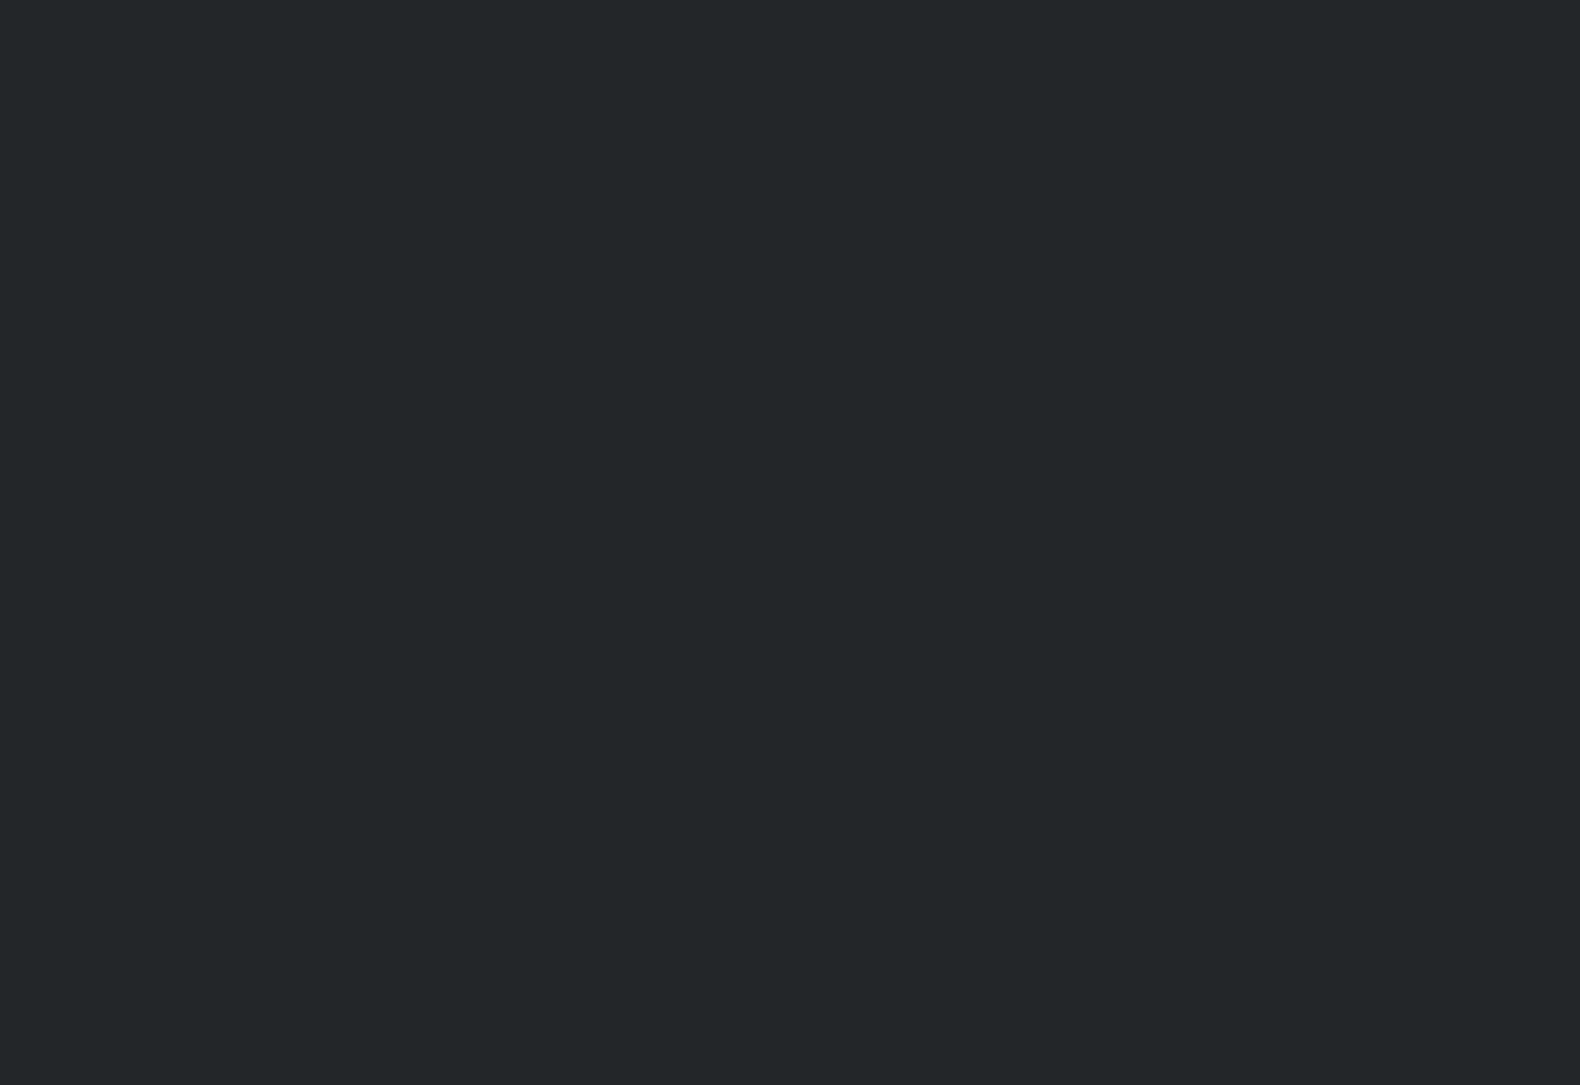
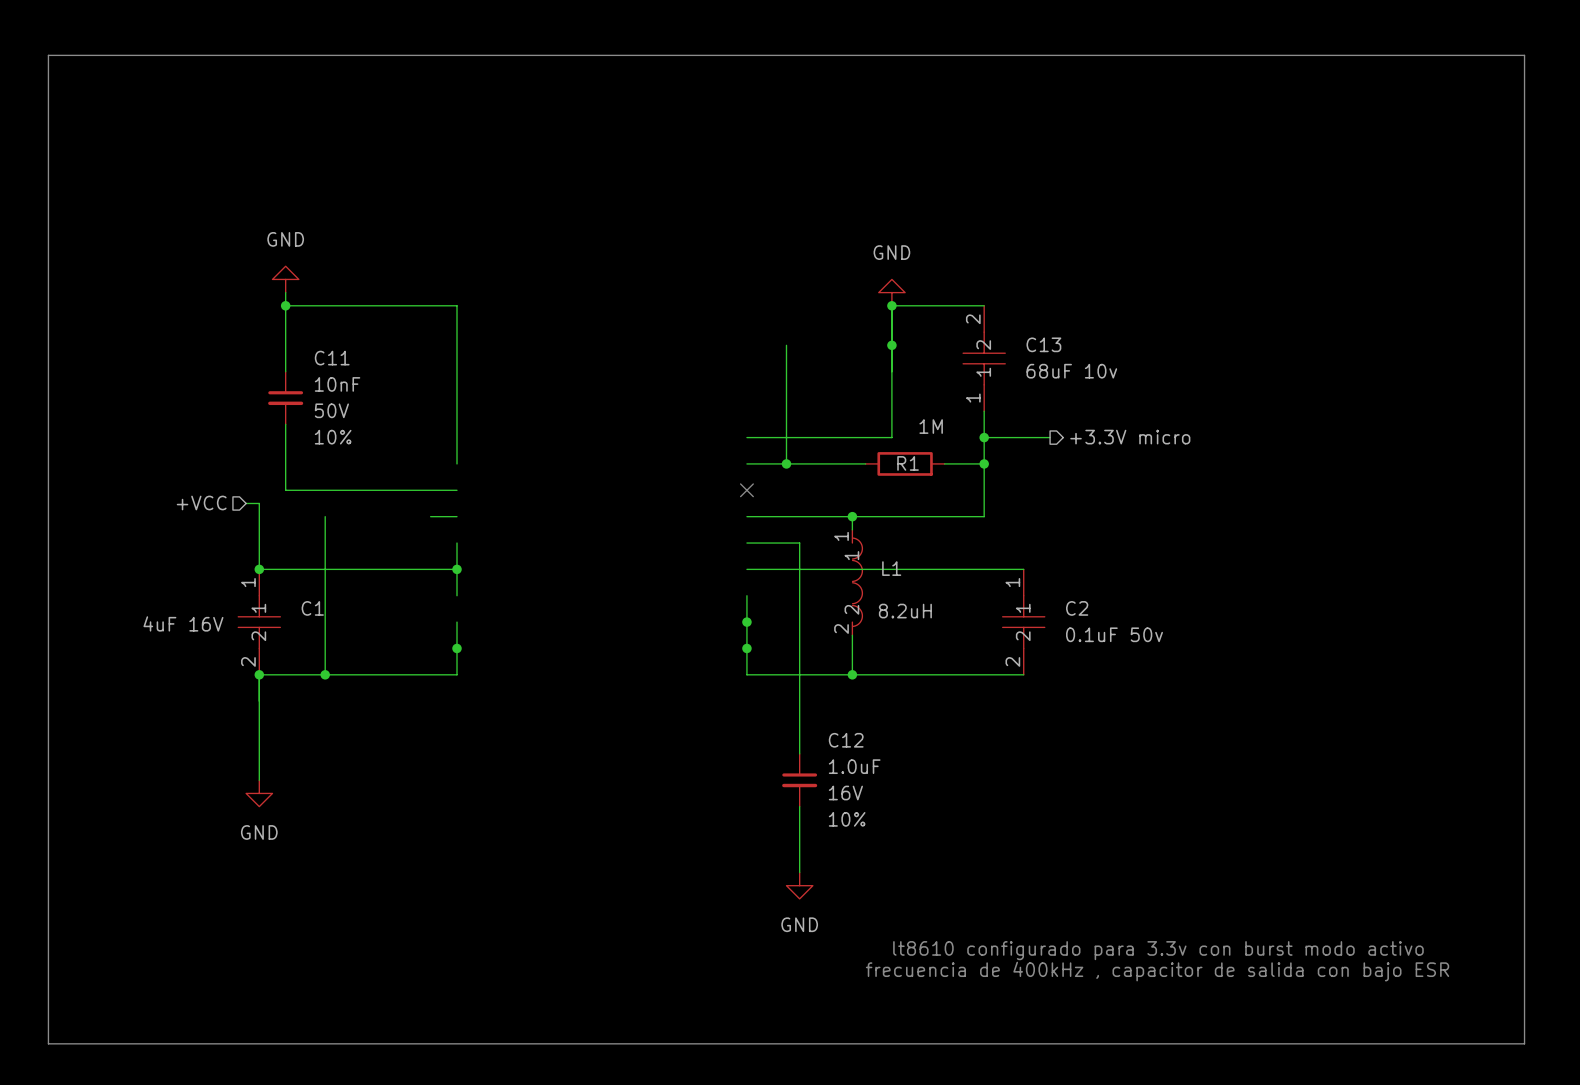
line: none -> (48, 55) (1524, 55) (1524, 1043) (48, 1043) (48, 55)
power symbol: none -> GND (285, 279)
wire: none -> (285, 292) (285, 371)
power symbol: none -> GND (891, 292)
wire: none -> (285, 305) (457, 305) (457, 463)
junction: none -> (285, 305)
junction: none -> (891, 305)
wire: none -> (984, 305) (891, 305) (891, 437) (746, 437)
wire: none -> (786, 345) (786, 463)
junction: none -> (891, 345)
C13: none -> 68uF 10v (984, 358)
C11: none -> 10nF (285, 398)
wire: none -> (984, 411) (984, 516) (746, 516)
wire: none -> (285, 424) (285, 490) (457, 490)
wire: none -> (984, 437) (1050, 437)
junction: none -> (984, 437)
hierarchical label: none -> +3.3V micro (1130, 437)
wire: none -> (746, 463) (865, 463)
junction: none -> (786, 463)
R1: none -> (905, 463)
wire: none -> (944, 463) (984, 463)
junction: none -> (984, 463)
no-connect mark: none -> (746, 490)
hierarchical label: none -> +VCC (201, 502)
wire: none -> (246, 503) (259, 503) (259, 569) (457, 569)
wire: none -> (325, 516) (325, 674)
wire: none -> (430, 516) (457, 516)
wire: none -> (852, 516) (852, 529)
junction: none -> (852, 516)
wire: none -> (457, 543) (457, 595)
wire: none -> (746, 543) (799, 543) (799, 753)
junction: none -> (259, 569)
junction: none -> (457, 569)
wire: none -> (746, 569) (1023, 569)
L1: none -> 8.2uH (857, 582)
wire: none -> (746, 595) (746, 674) (1023, 674)
C1: none -> 4uF 16V (259, 622)
wire: none -> (457, 622) (457, 674) (259, 674) (259, 780)
junction: none -> (746, 622)
C2: none -> 0.1uF 50v (1023, 622)
wire: none -> (852, 635) (852, 674)
junction: none -> (457, 648)
junction: none -> (746, 648)
junction: none -> (259, 674)
junction: none -> (325, 674)
junction: none -> (852, 674)
C12: none -> 1.0uF (799, 780)
power symbol: none -> GND (259, 793)
wire: none -> (799, 806) (799, 872)
power symbol: none -> GND (799, 885)
text: none -> lt8610 configurado para 3.3v con burst modo activo (1158, 950)
text: none -> frecuencia de 400kHz , capacitor de salida con bajo ESR (1157, 971)

